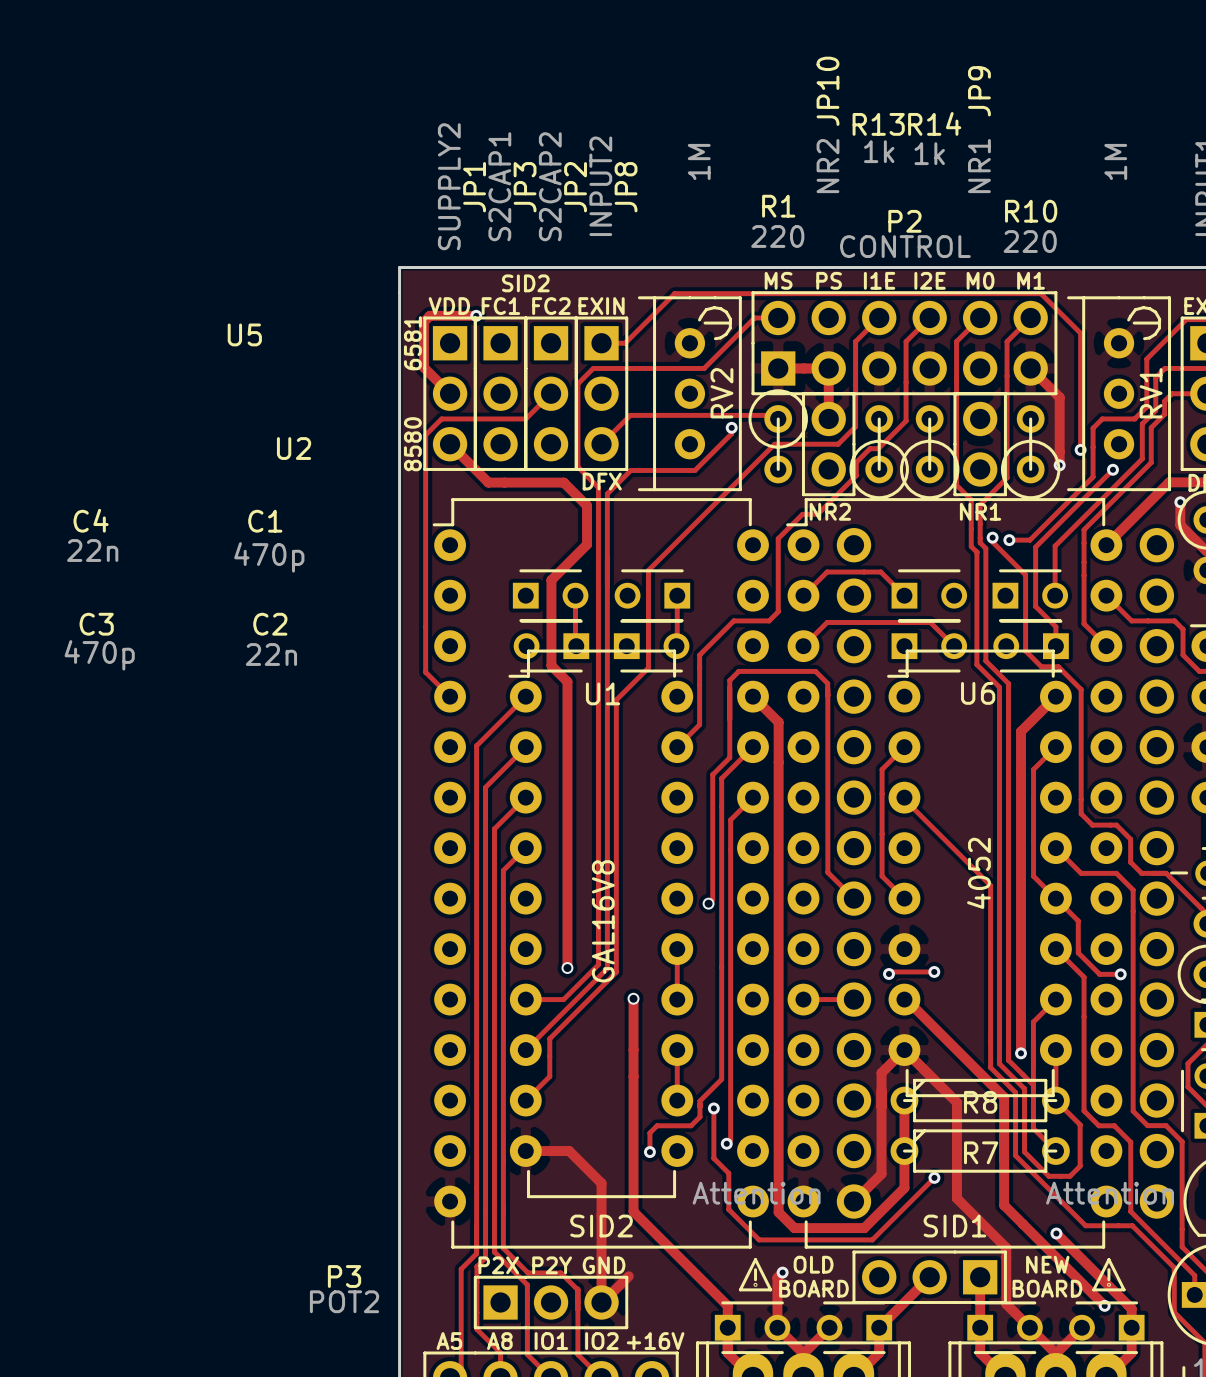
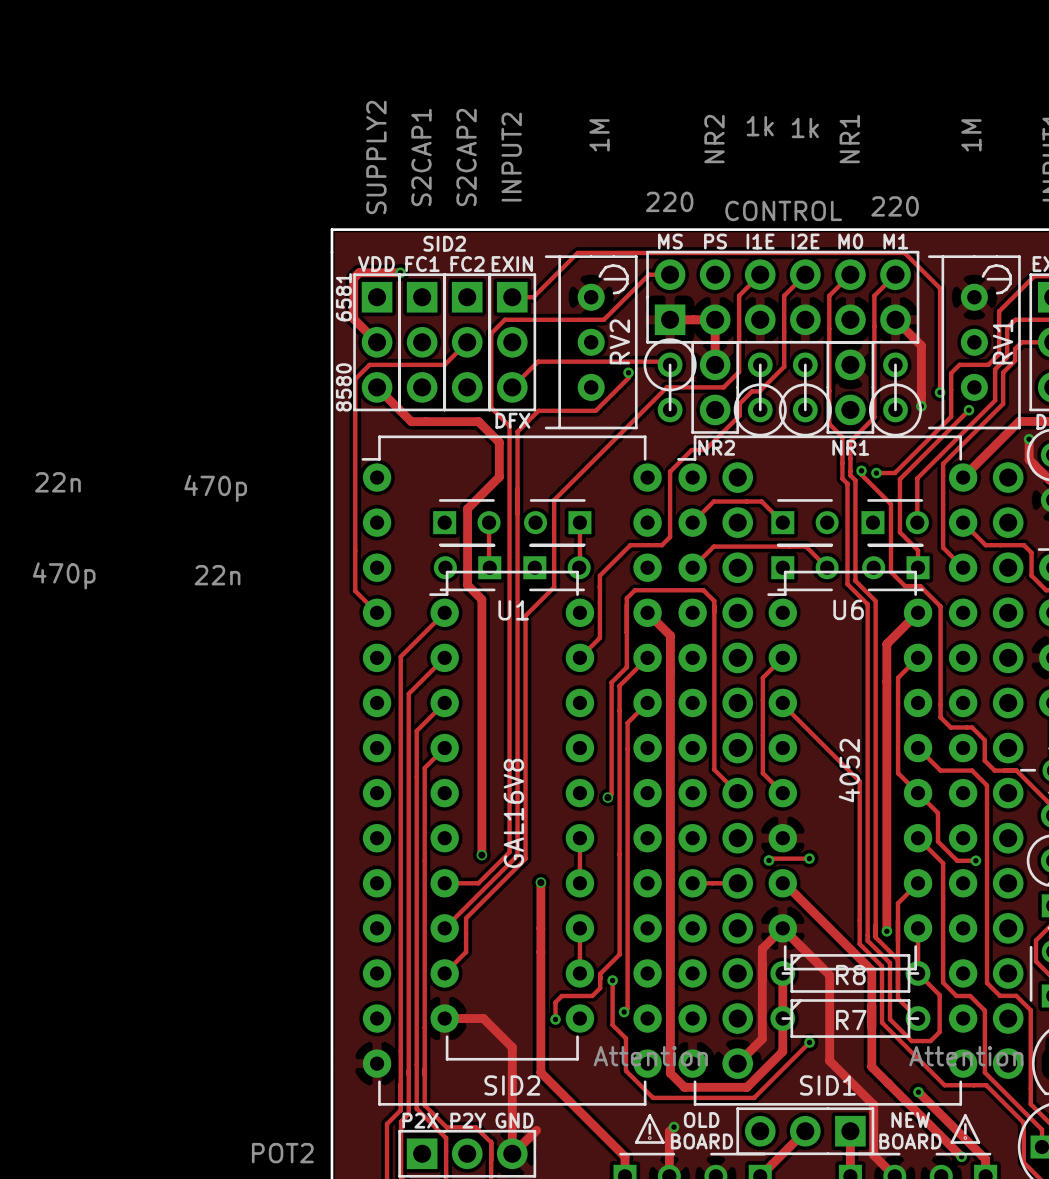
JP10 name: JP10 (827, 91) -> none
JP9 name: JP9 (979, 91) -> none
R14 name: R14 (934, 123) -> none
R13 name: R13 (878, 124) -> none
JP1 name: JP1 (474, 187) -> none
JP3 name: JP3 (525, 187) -> none
JP2 name: JP2 (575, 187) -> none
JP8 name: JP8 (626, 187) -> none
R1 name: R1 (778, 206) -> none
R10 name: R10 (1031, 211) -> none
P2 name: P2 (904, 221) -> none
U5 name: U5 (244, 334) -> none
U2 name: U2 (294, 448) -> none
C4 name: C4 (91, 520) -> none
C1 name: C1 (265, 521) -> none
C3 name: C3 (96, 624) -> none
C2 name: C2 (270, 624) -> none
P3 name: P3 (344, 1276) -> none

